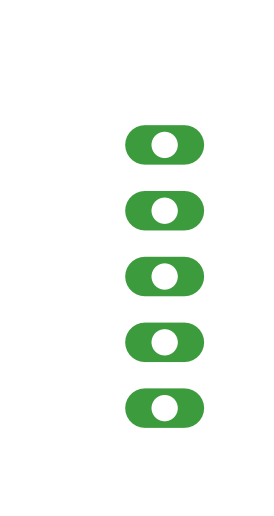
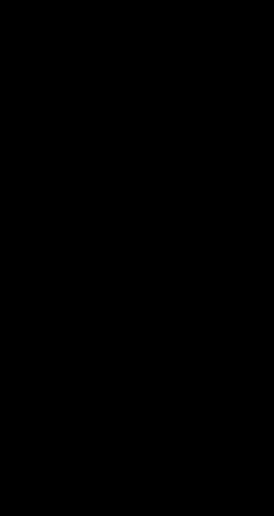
part: (164, 276) -> none

